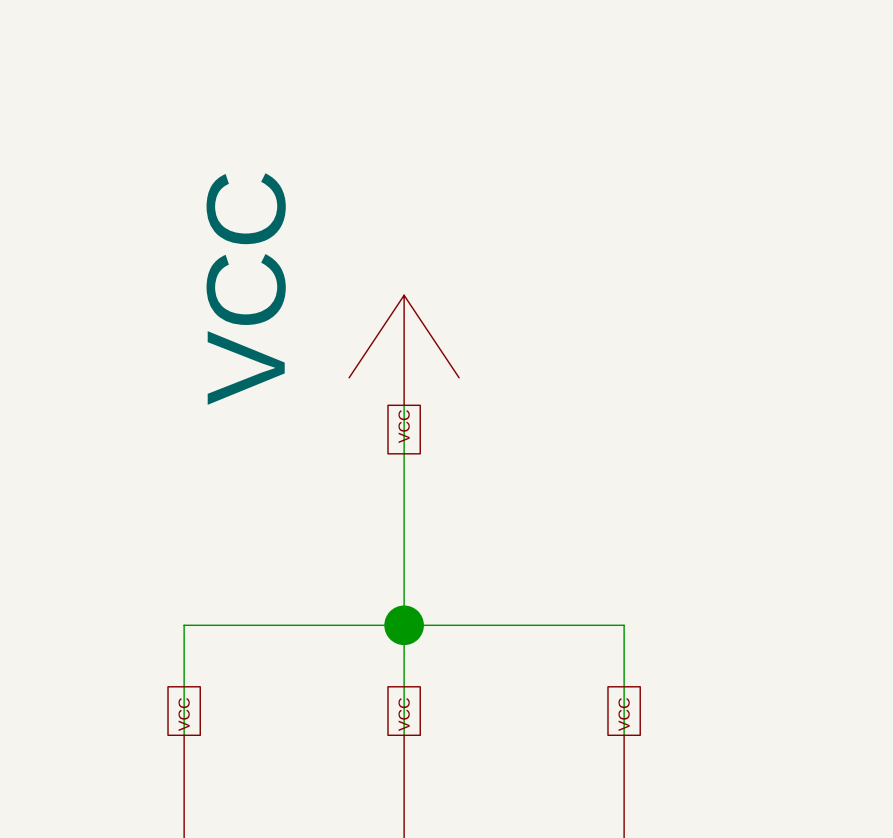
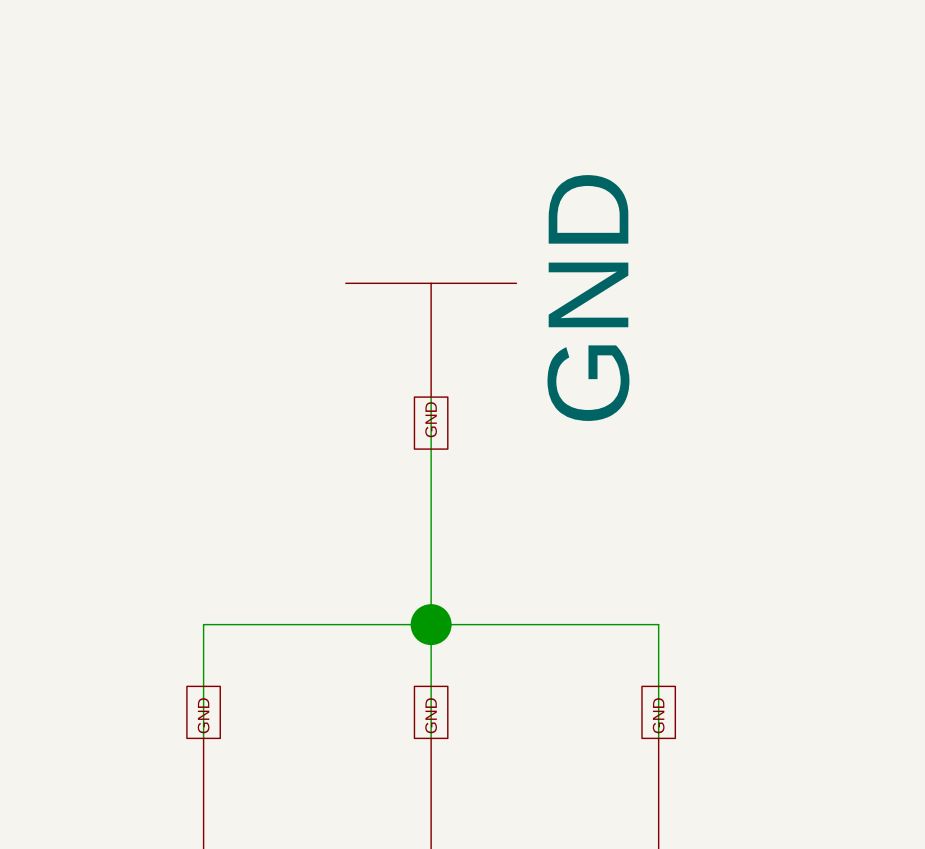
power symbol: VCC (404, 350) -> GND (431, 340)
global label: VCC (404, 426) -> GND (431, 419)
global label: VCC (184, 714) -> GND (203, 715)
global label: VCC (404, 714) -> GND (431, 715)
global label: VCC (624, 714) -> GND (658, 715)

